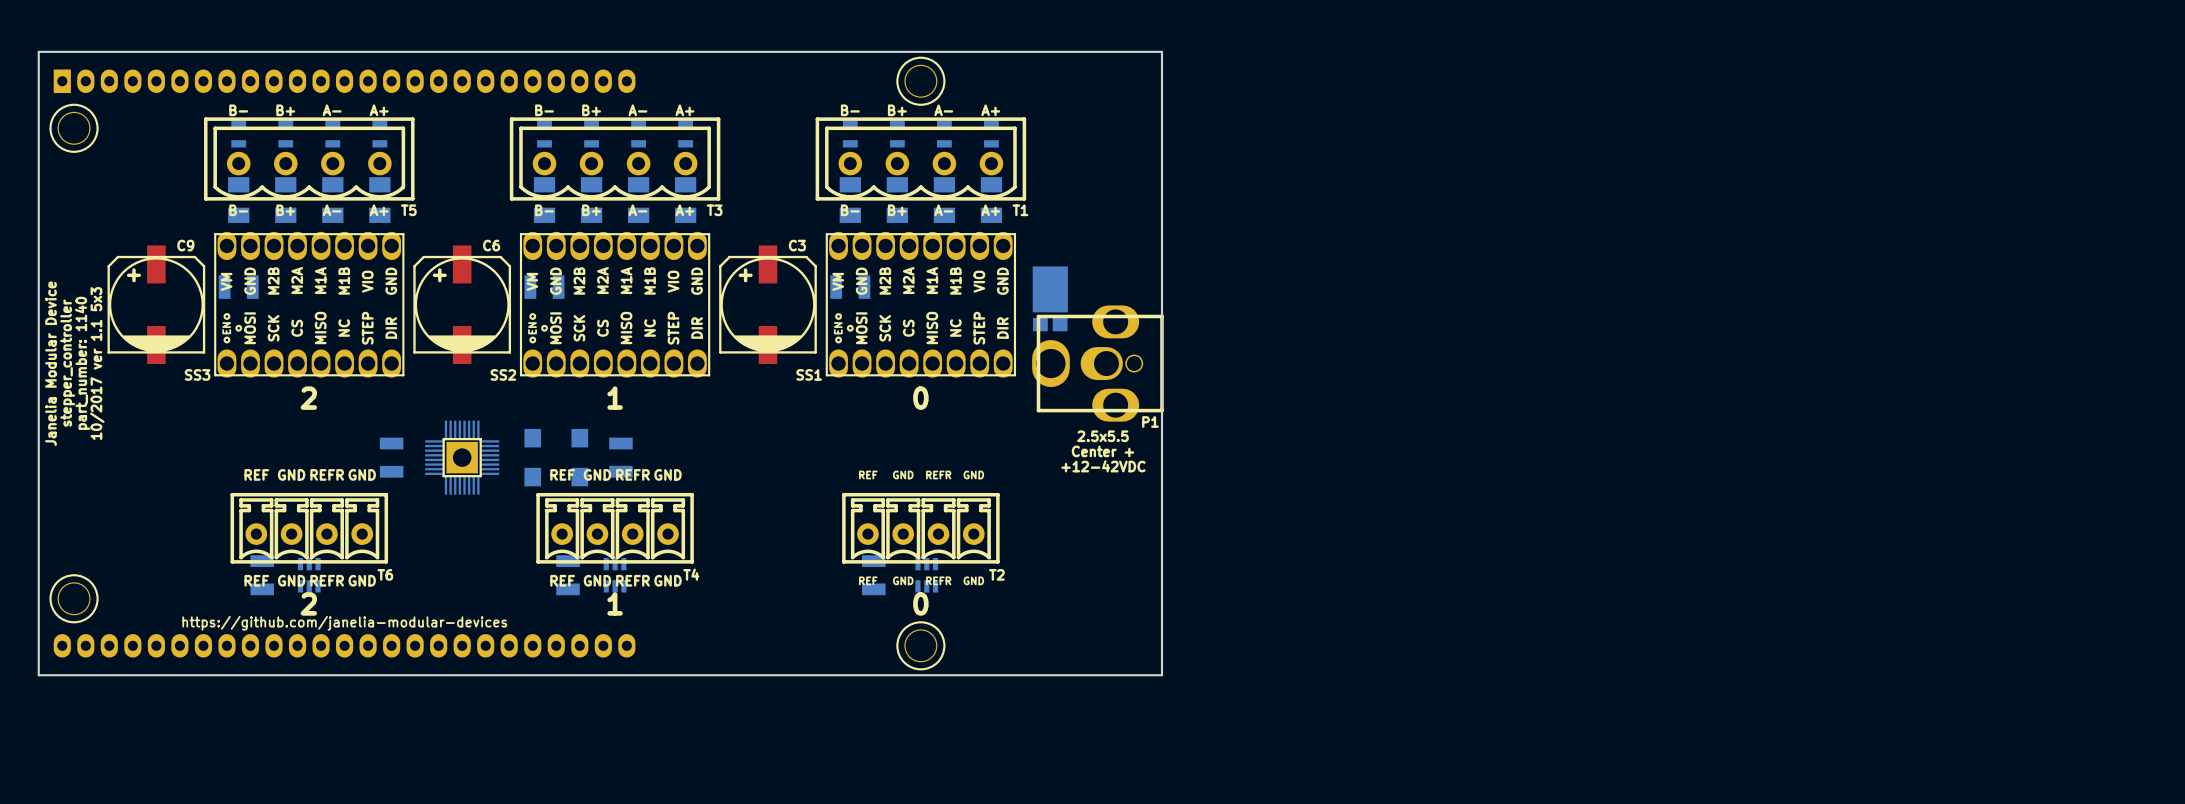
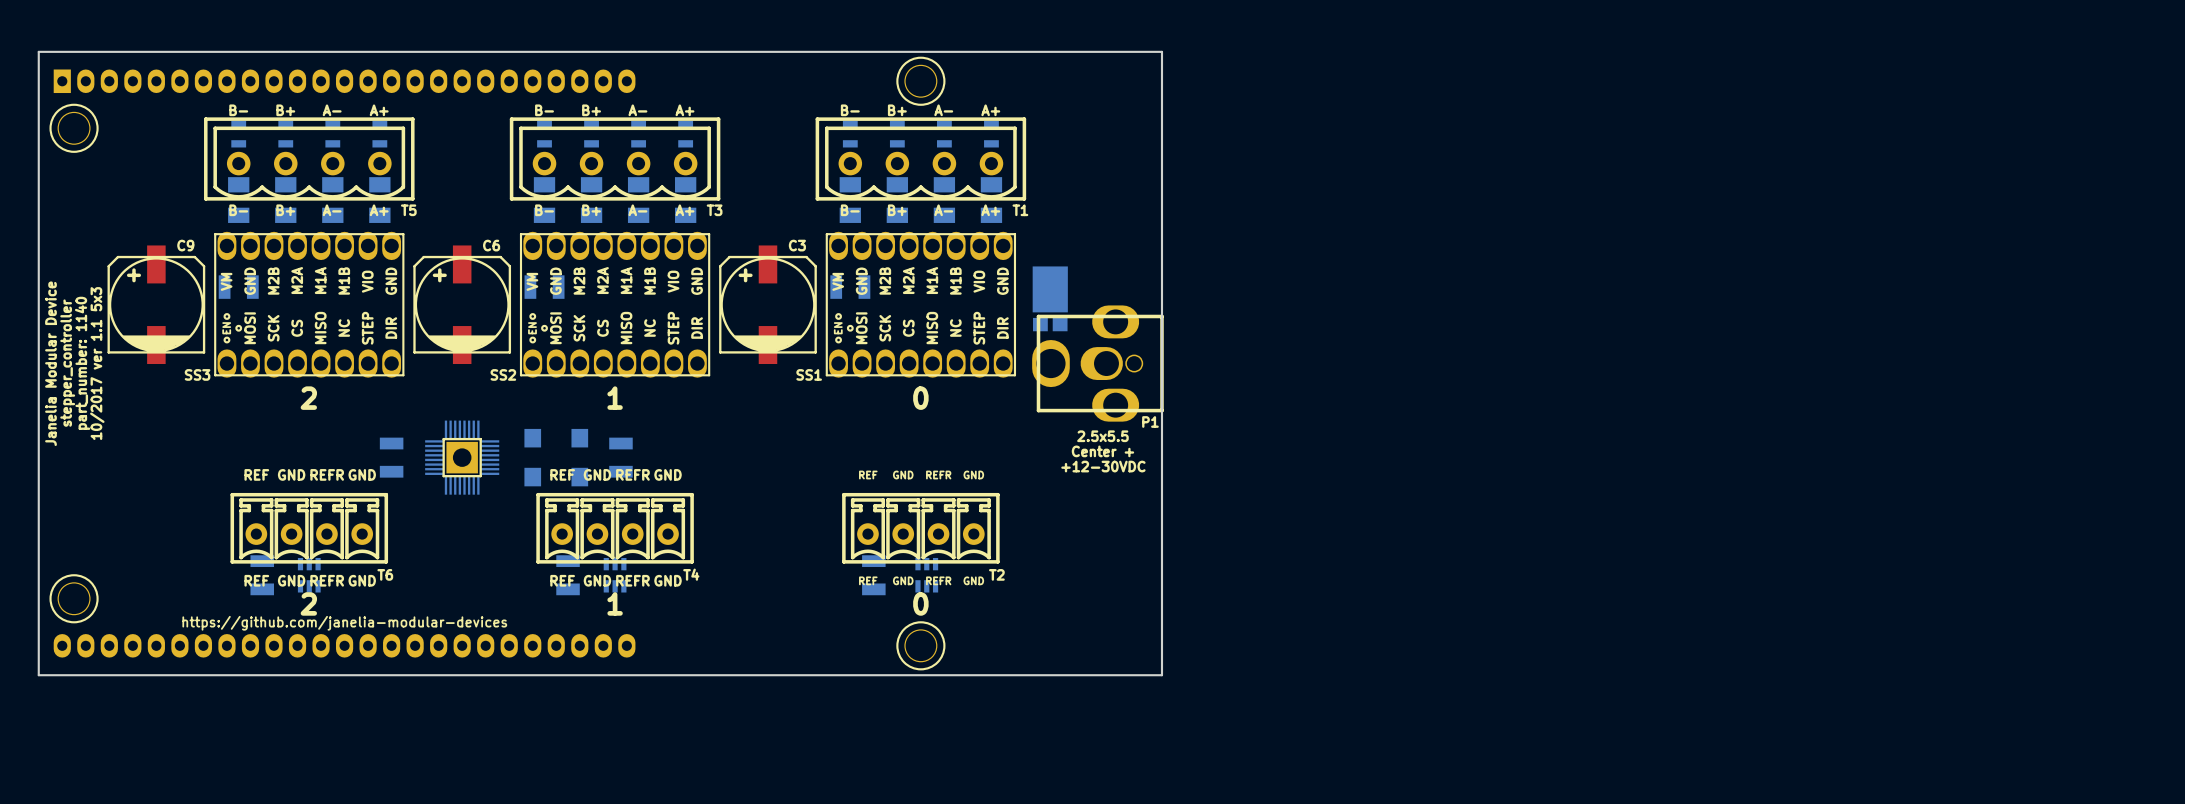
text: +12-42VDC (1103, 466) -> +12-30VDC (1103, 466)

